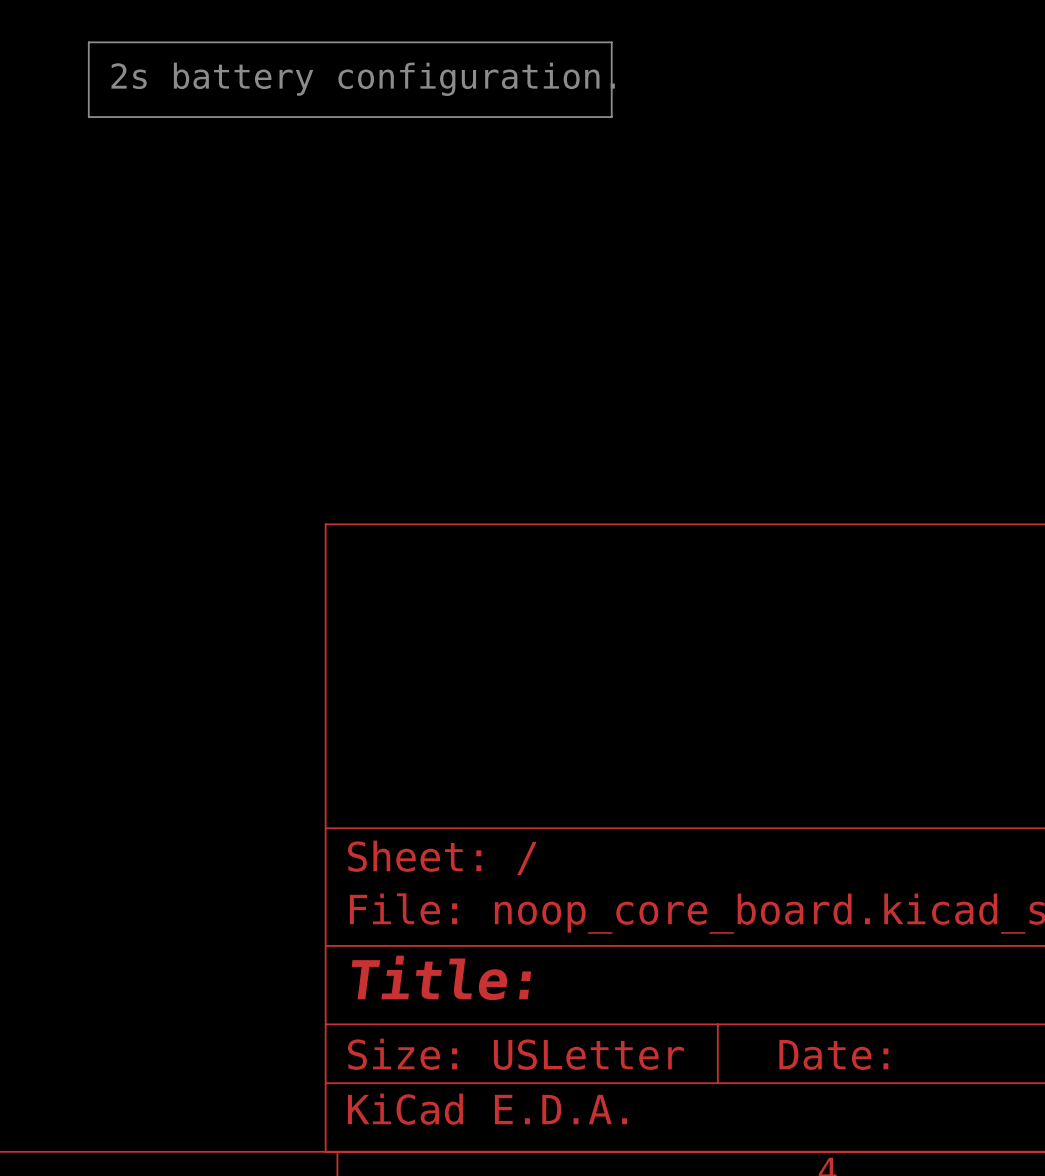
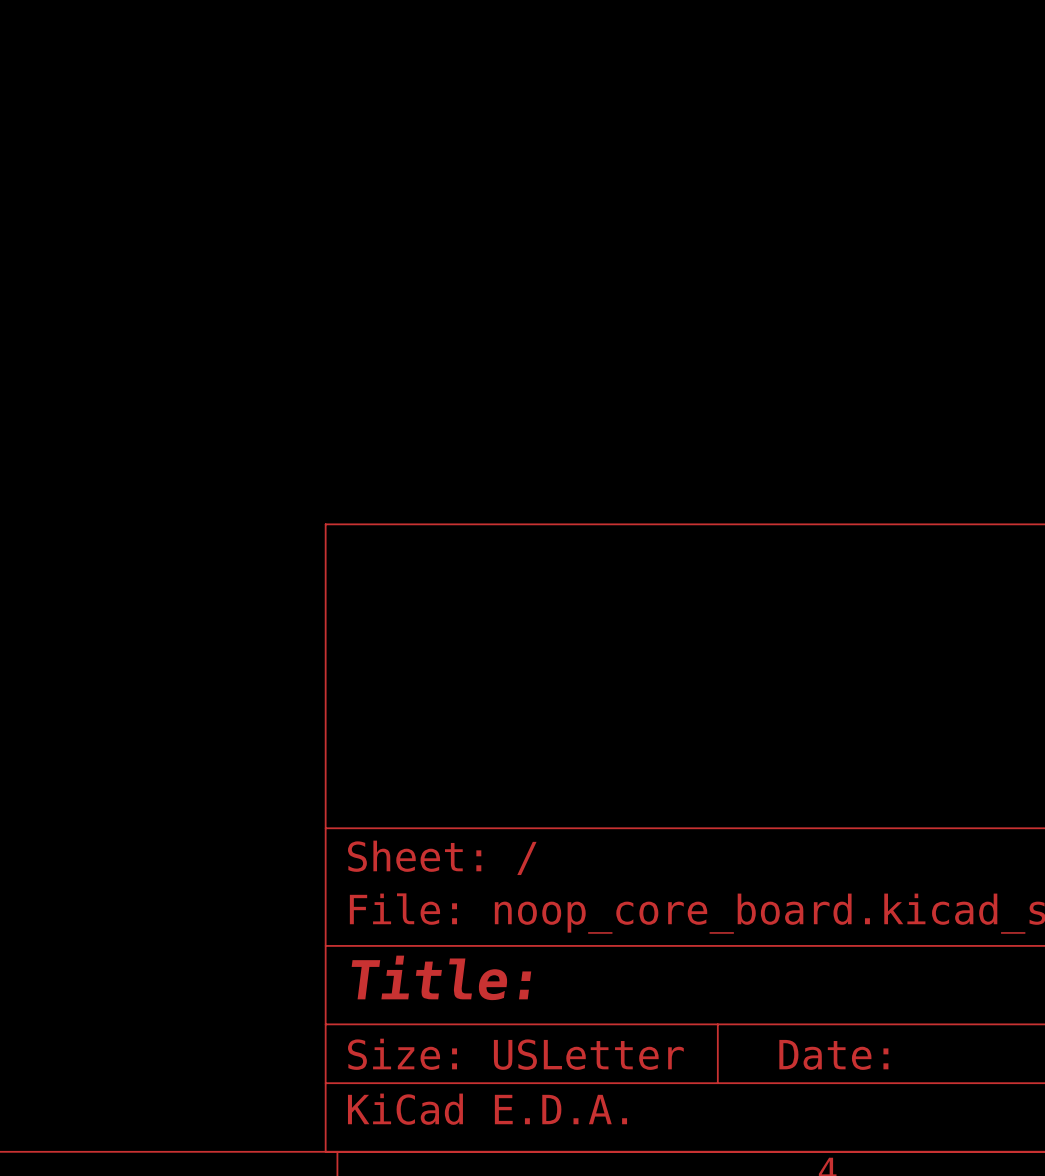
line: (88, 42) (611, 42) (611, 117) (88, 117) (88, 42) -> none
text: 2s battery configuration. (363, 79) -> none

